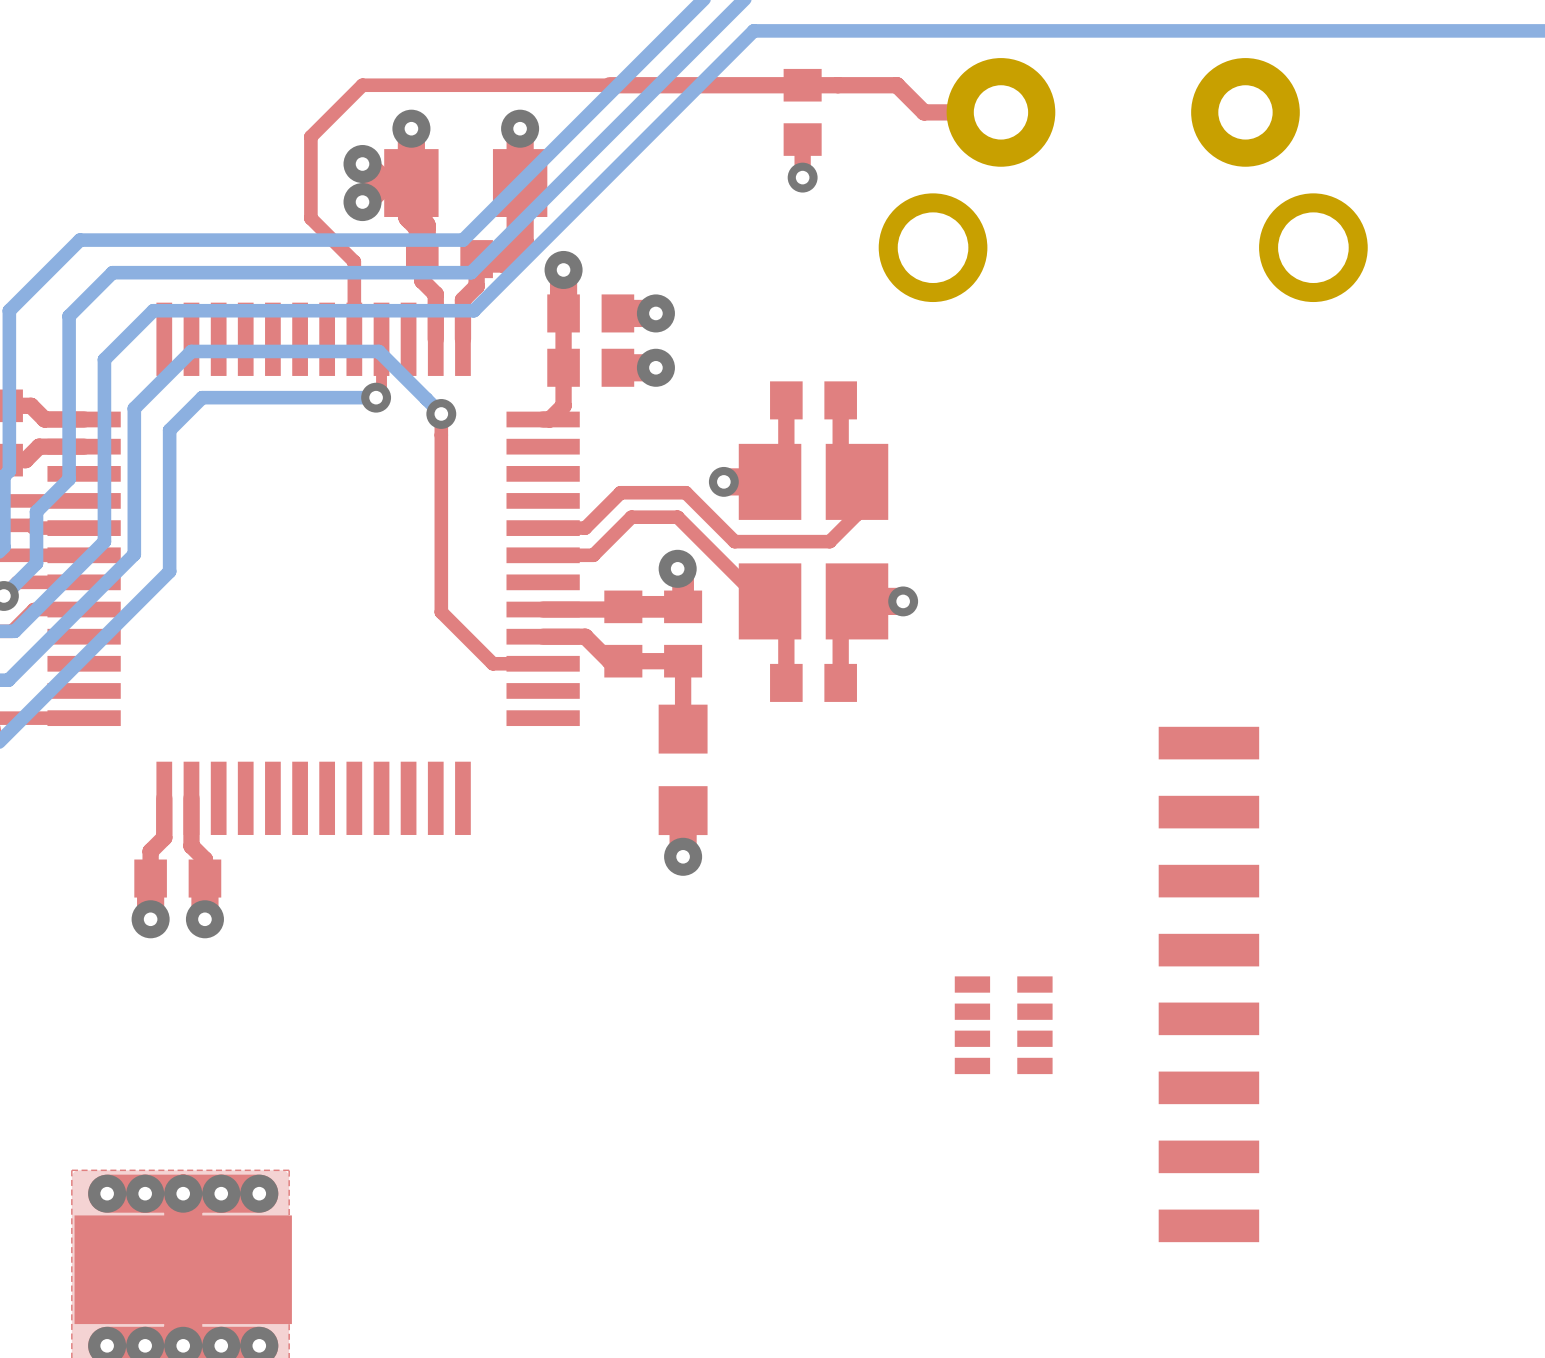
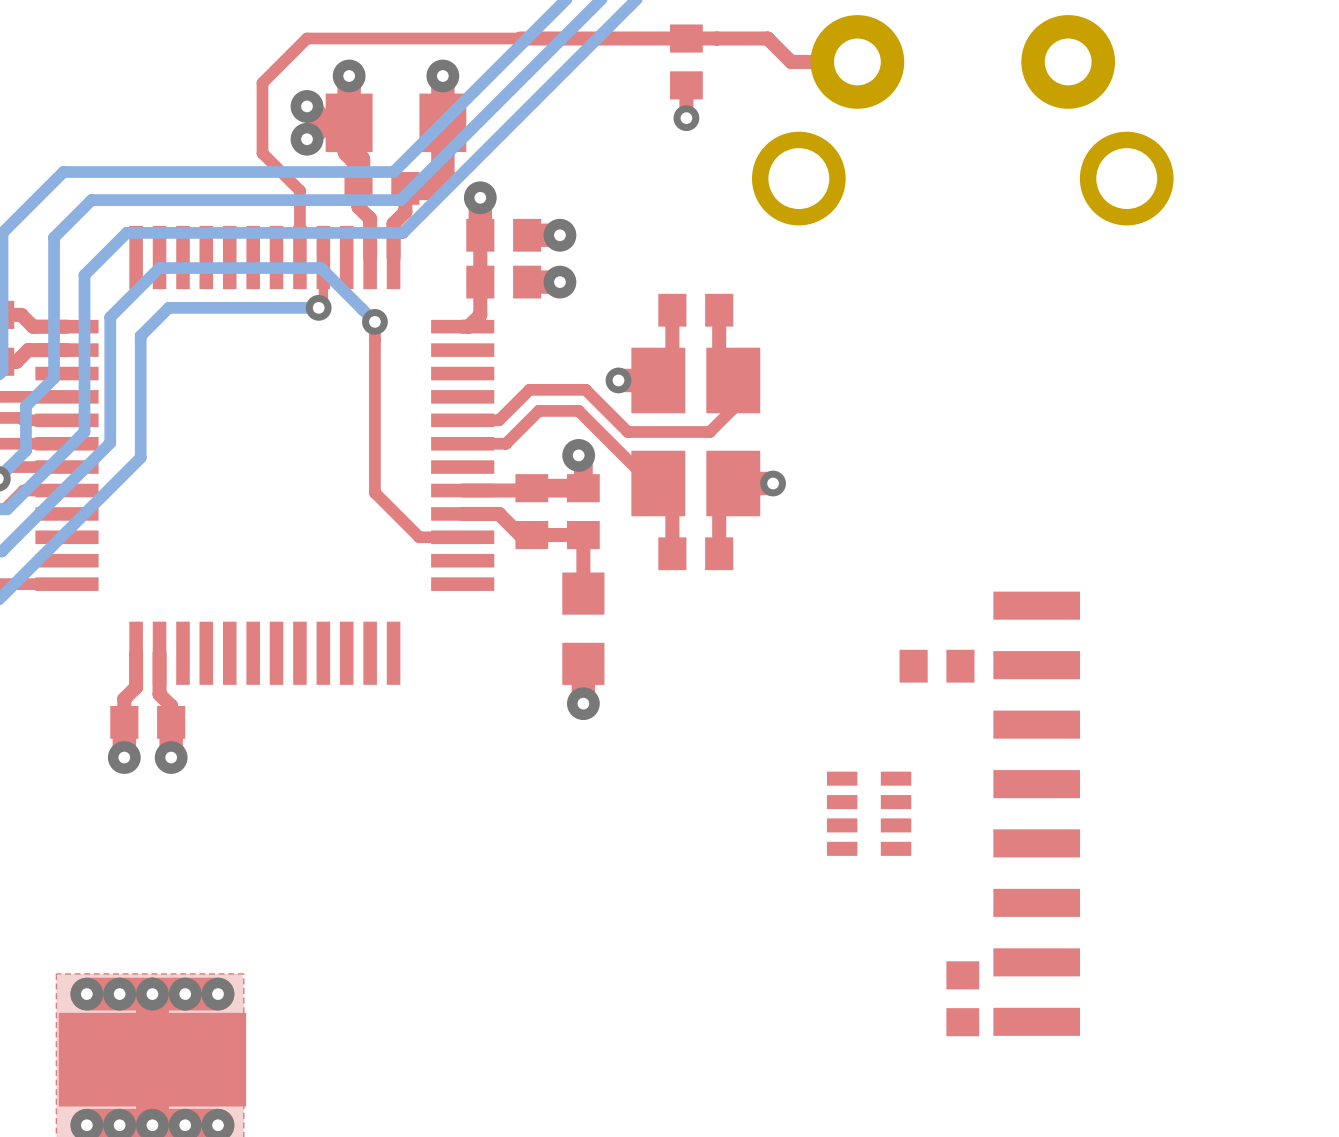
part: none -> (937, 666)
part position: (1003, 1025) -> (869, 813)
part: none -> (962, 998)

